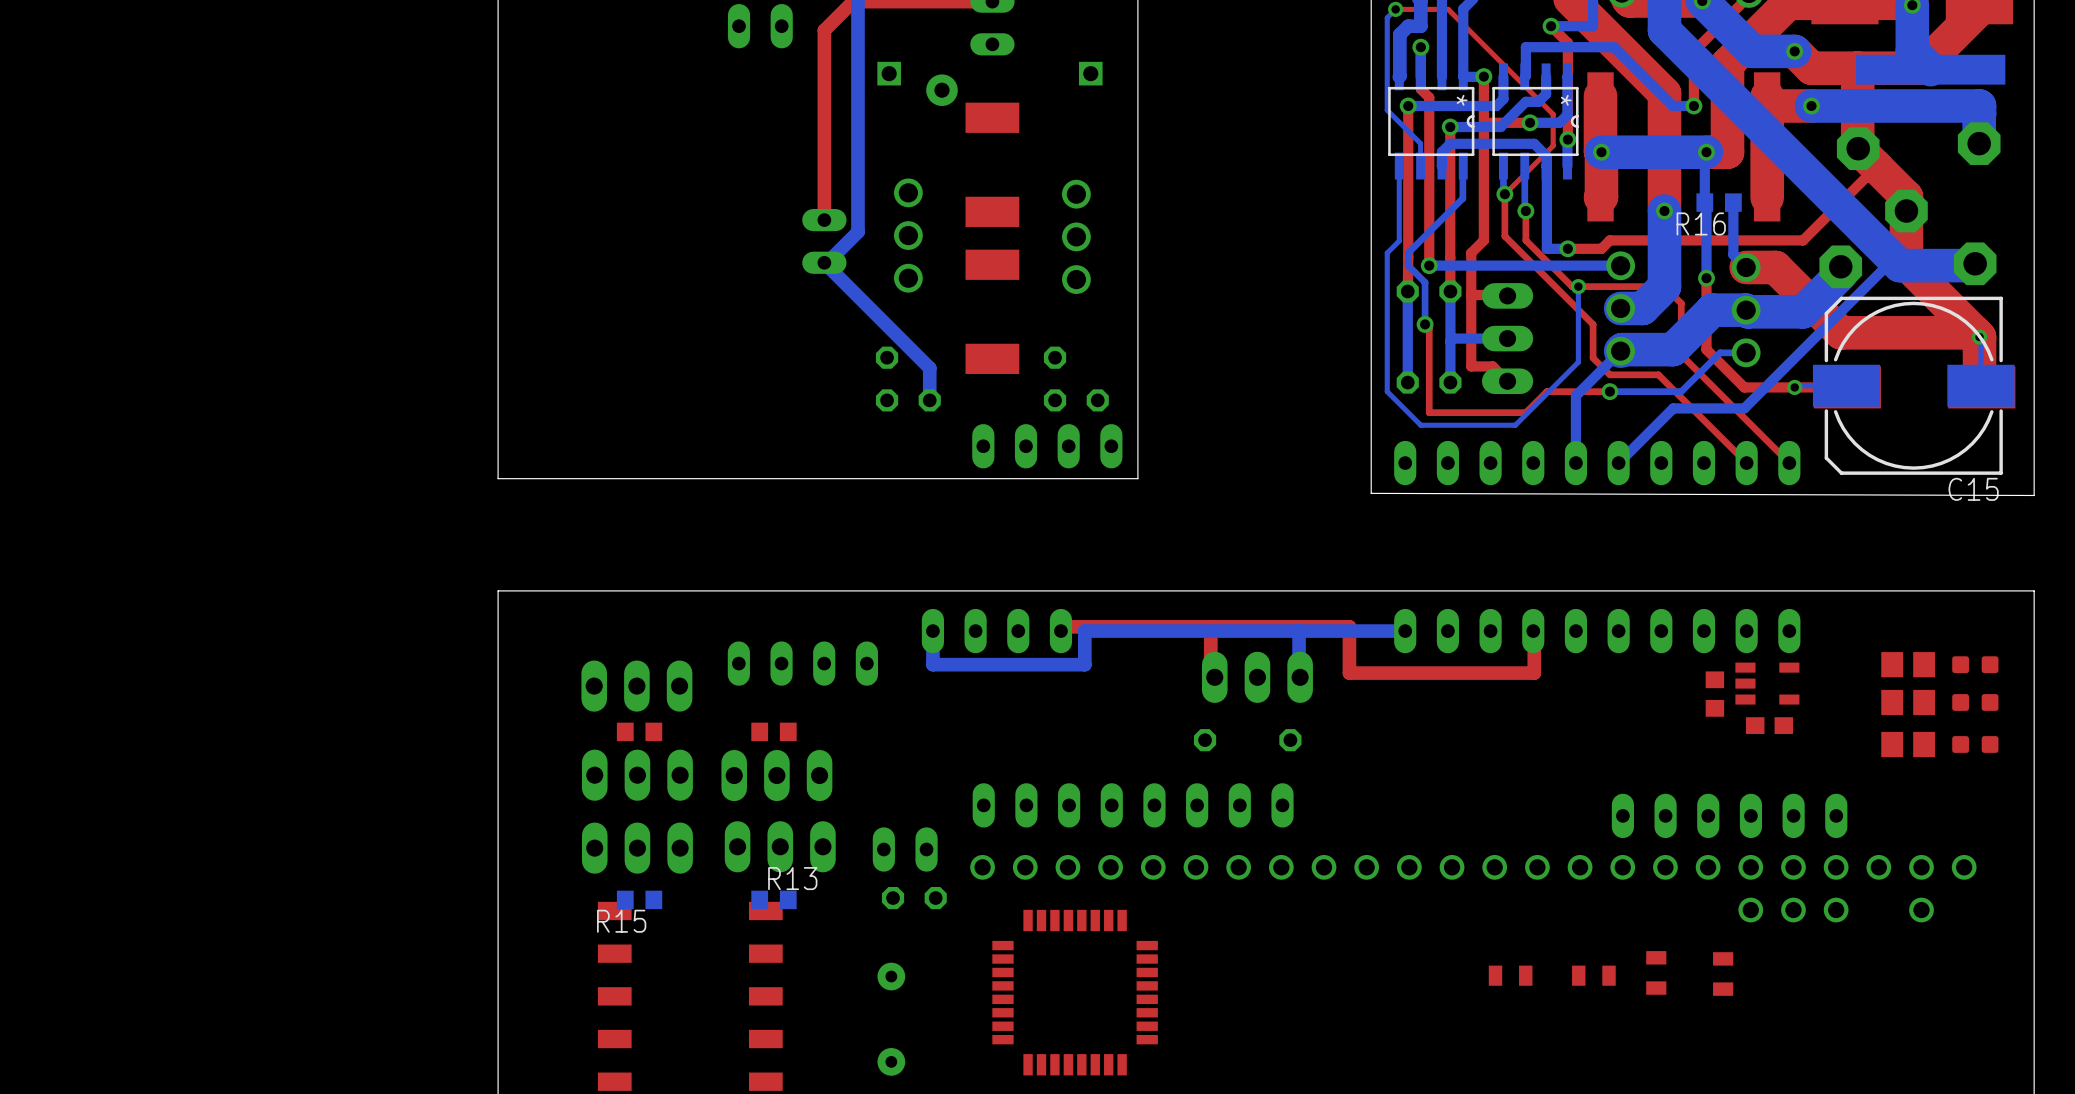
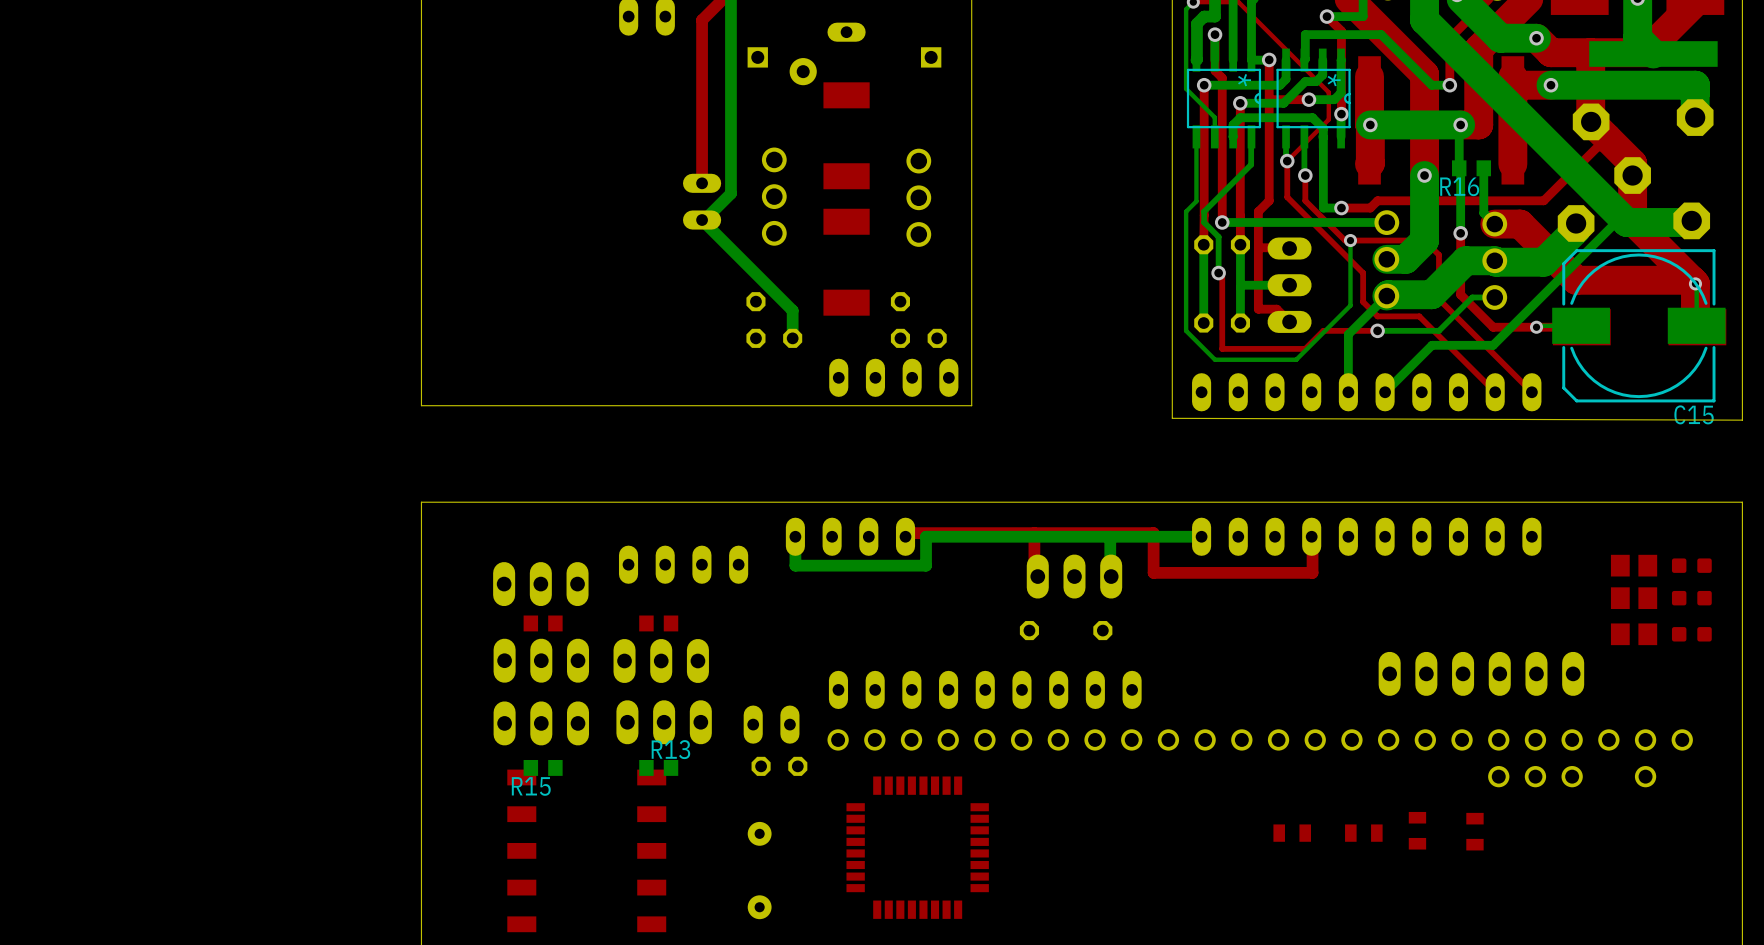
part: (1767, 683) -> none
part: (1714, 694) -> none
part: (1769, 725) -> none
part: none -> (1481, 673)
part: (1133, 805) -> none
part: none -> (985, 689)
part: (1729, 815) -> none

